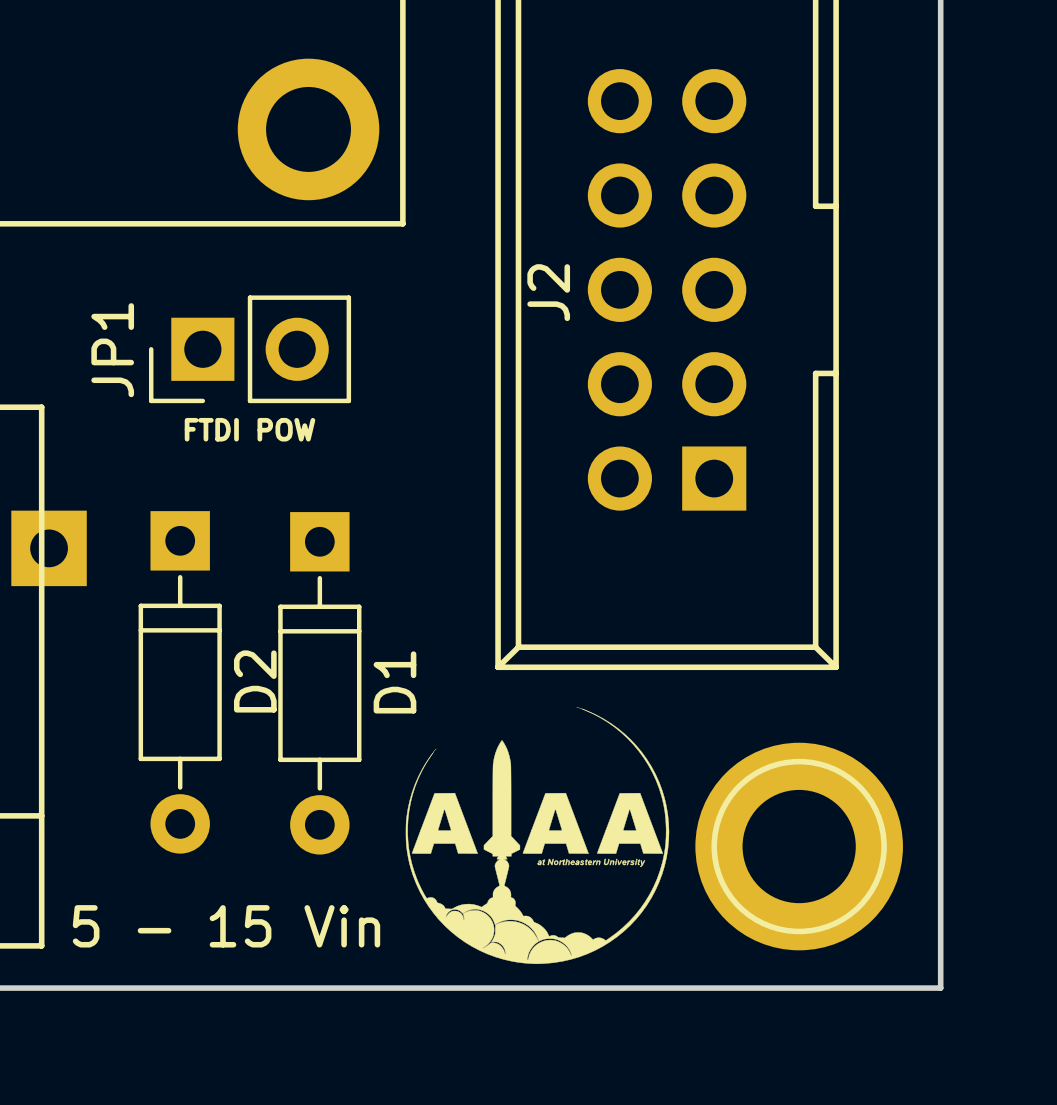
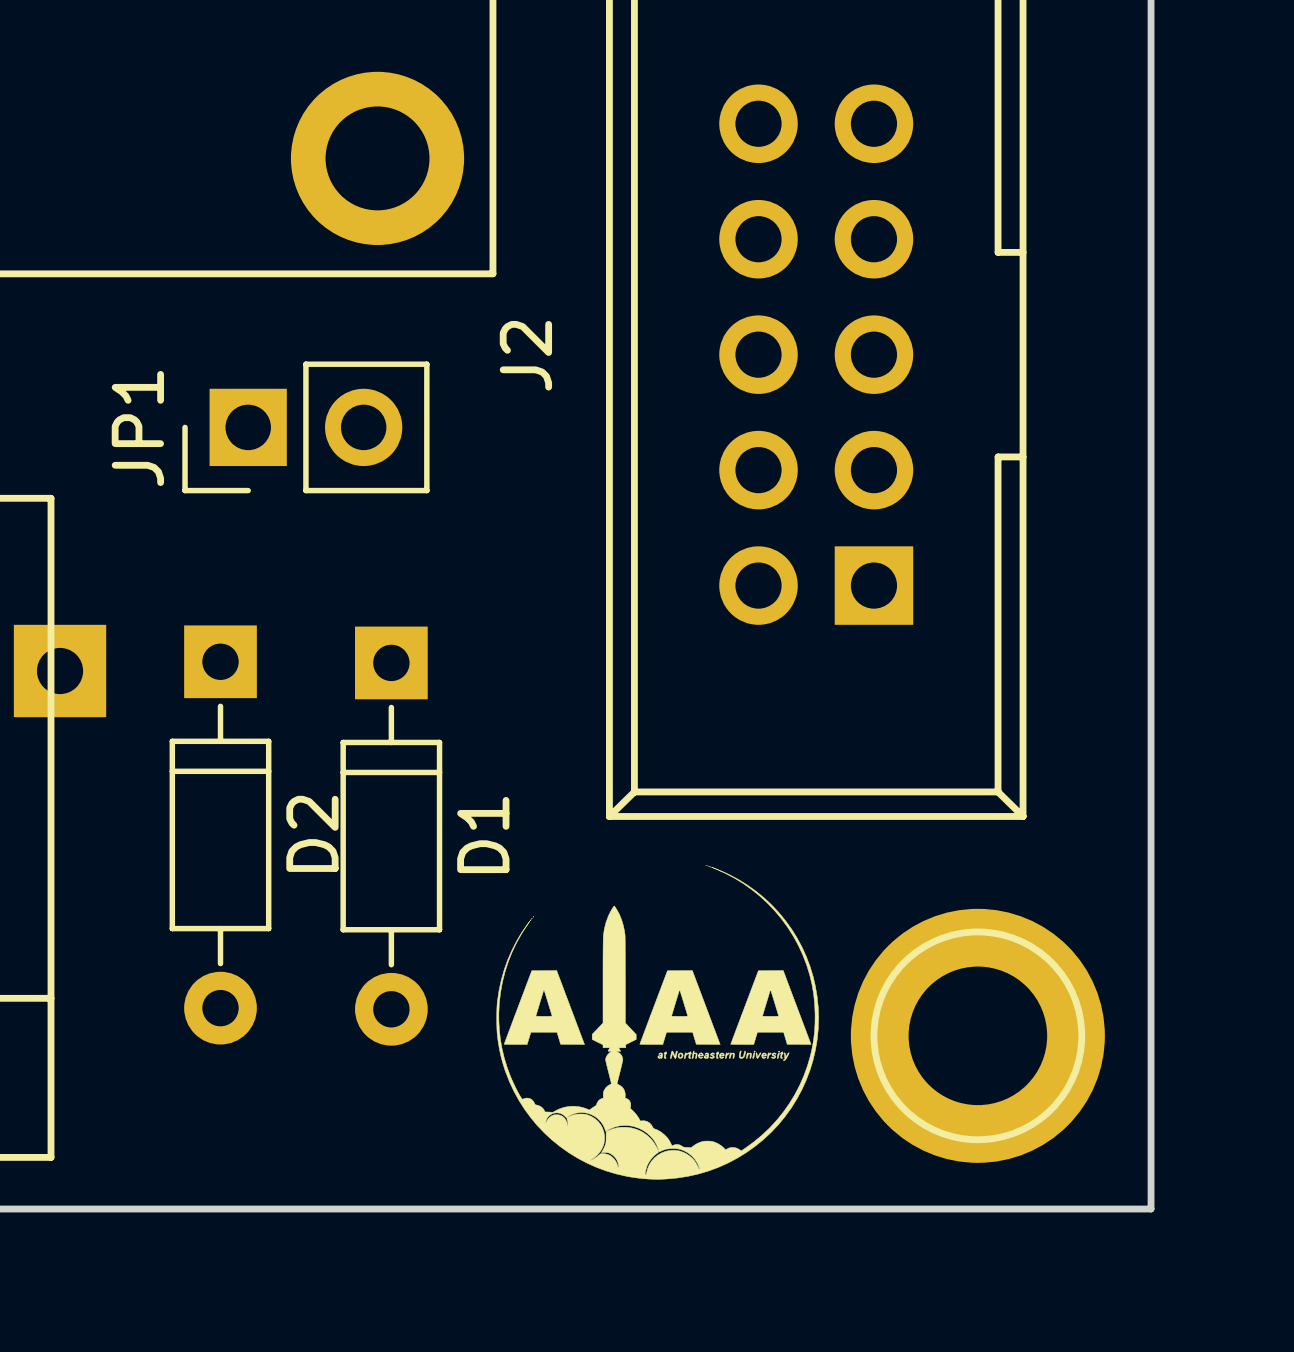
J2 name position: J2 (548, 292) -> J2 (525, 355)
text: FTDI POW (249, 429) -> none
text: 5 - 15 Vin (226, 926) -> none

